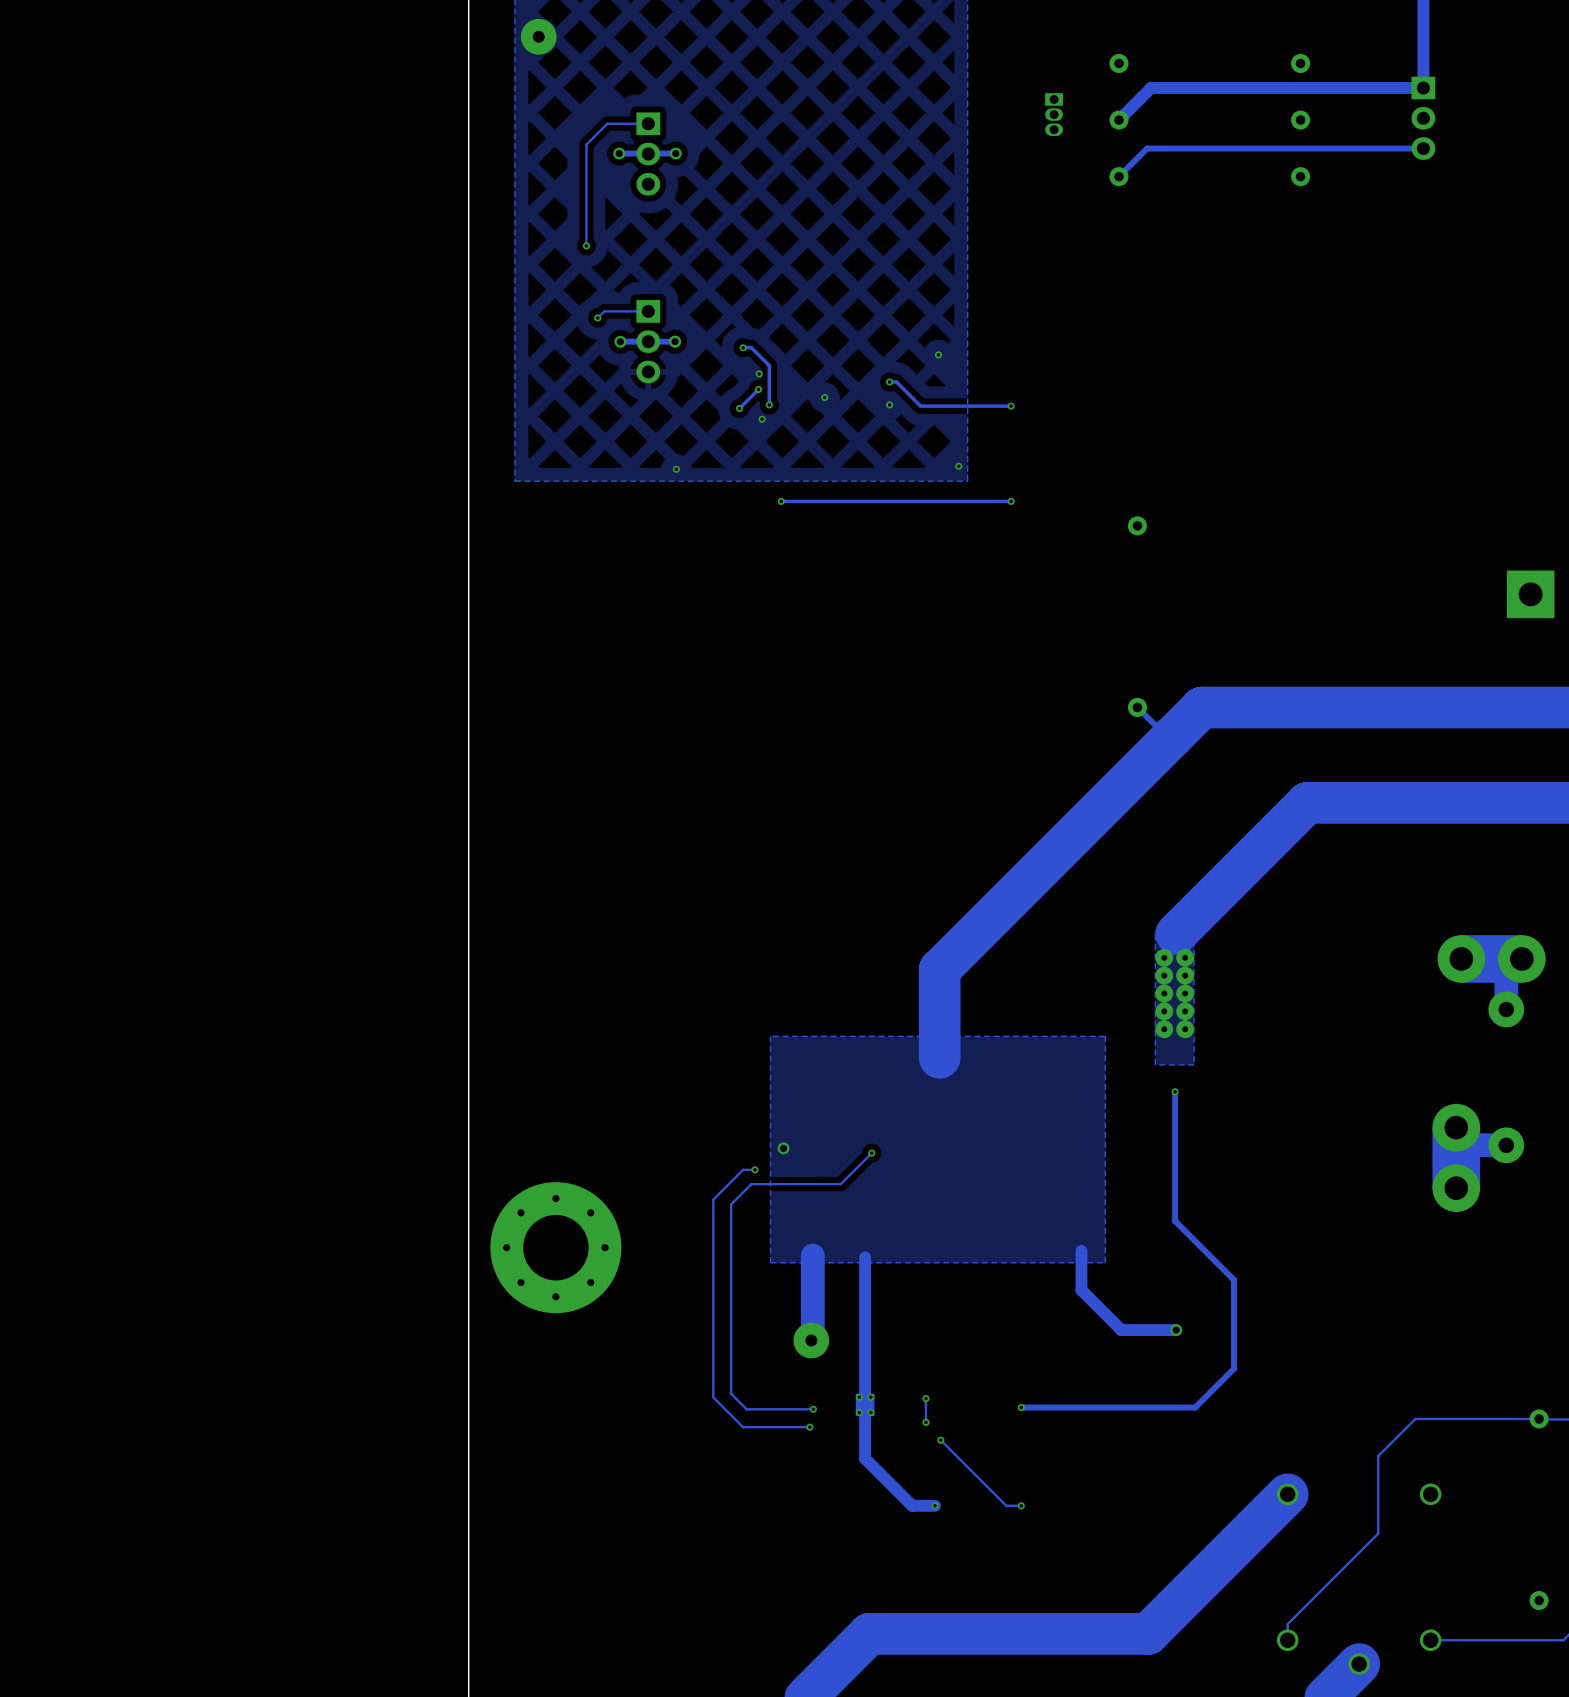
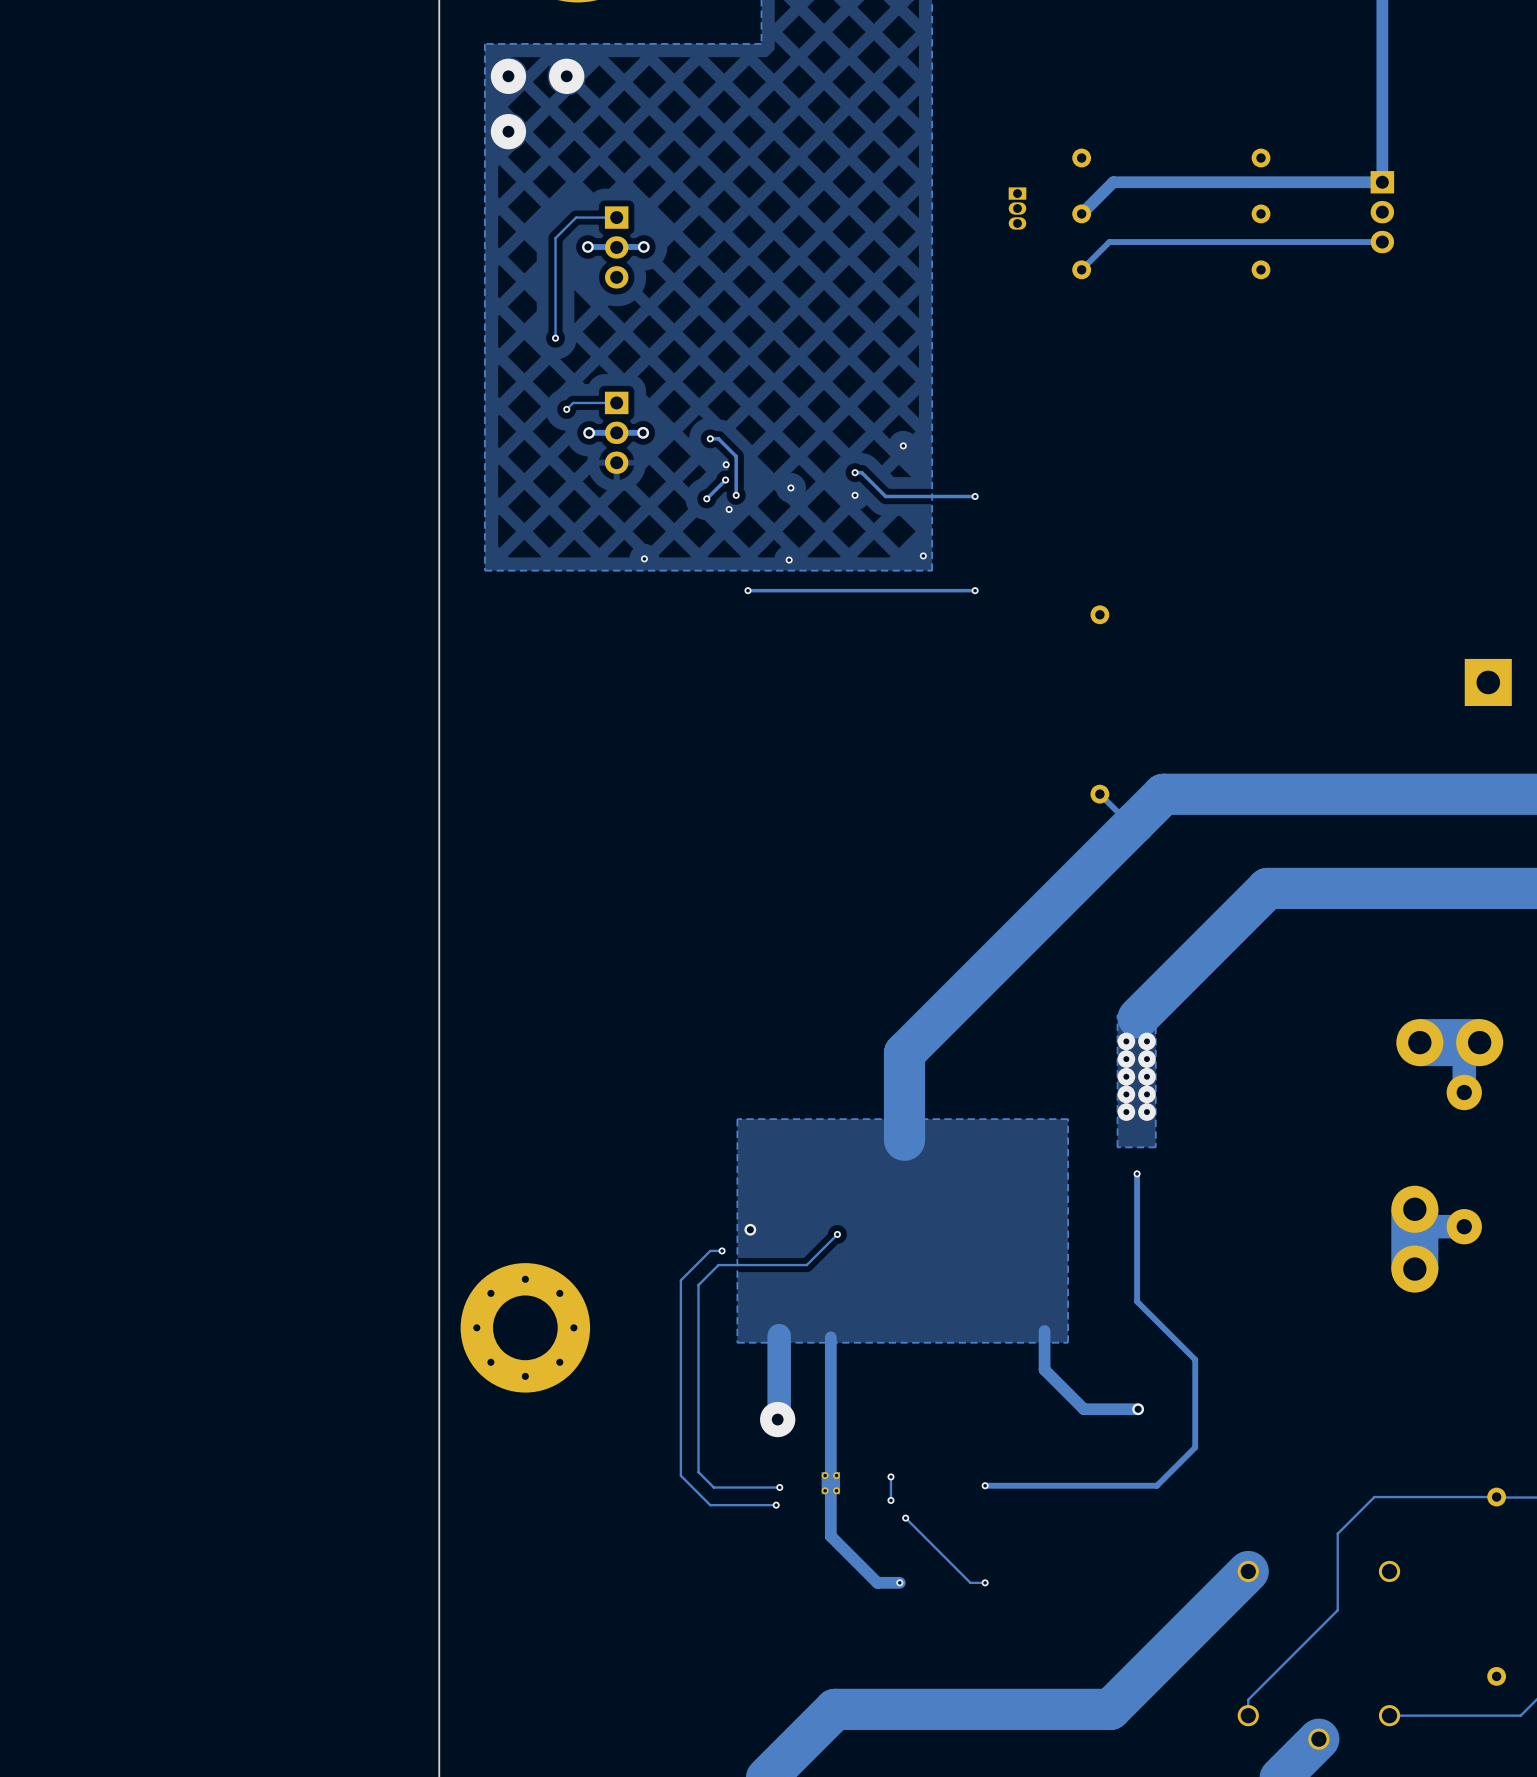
via: none -> (789, 560)

